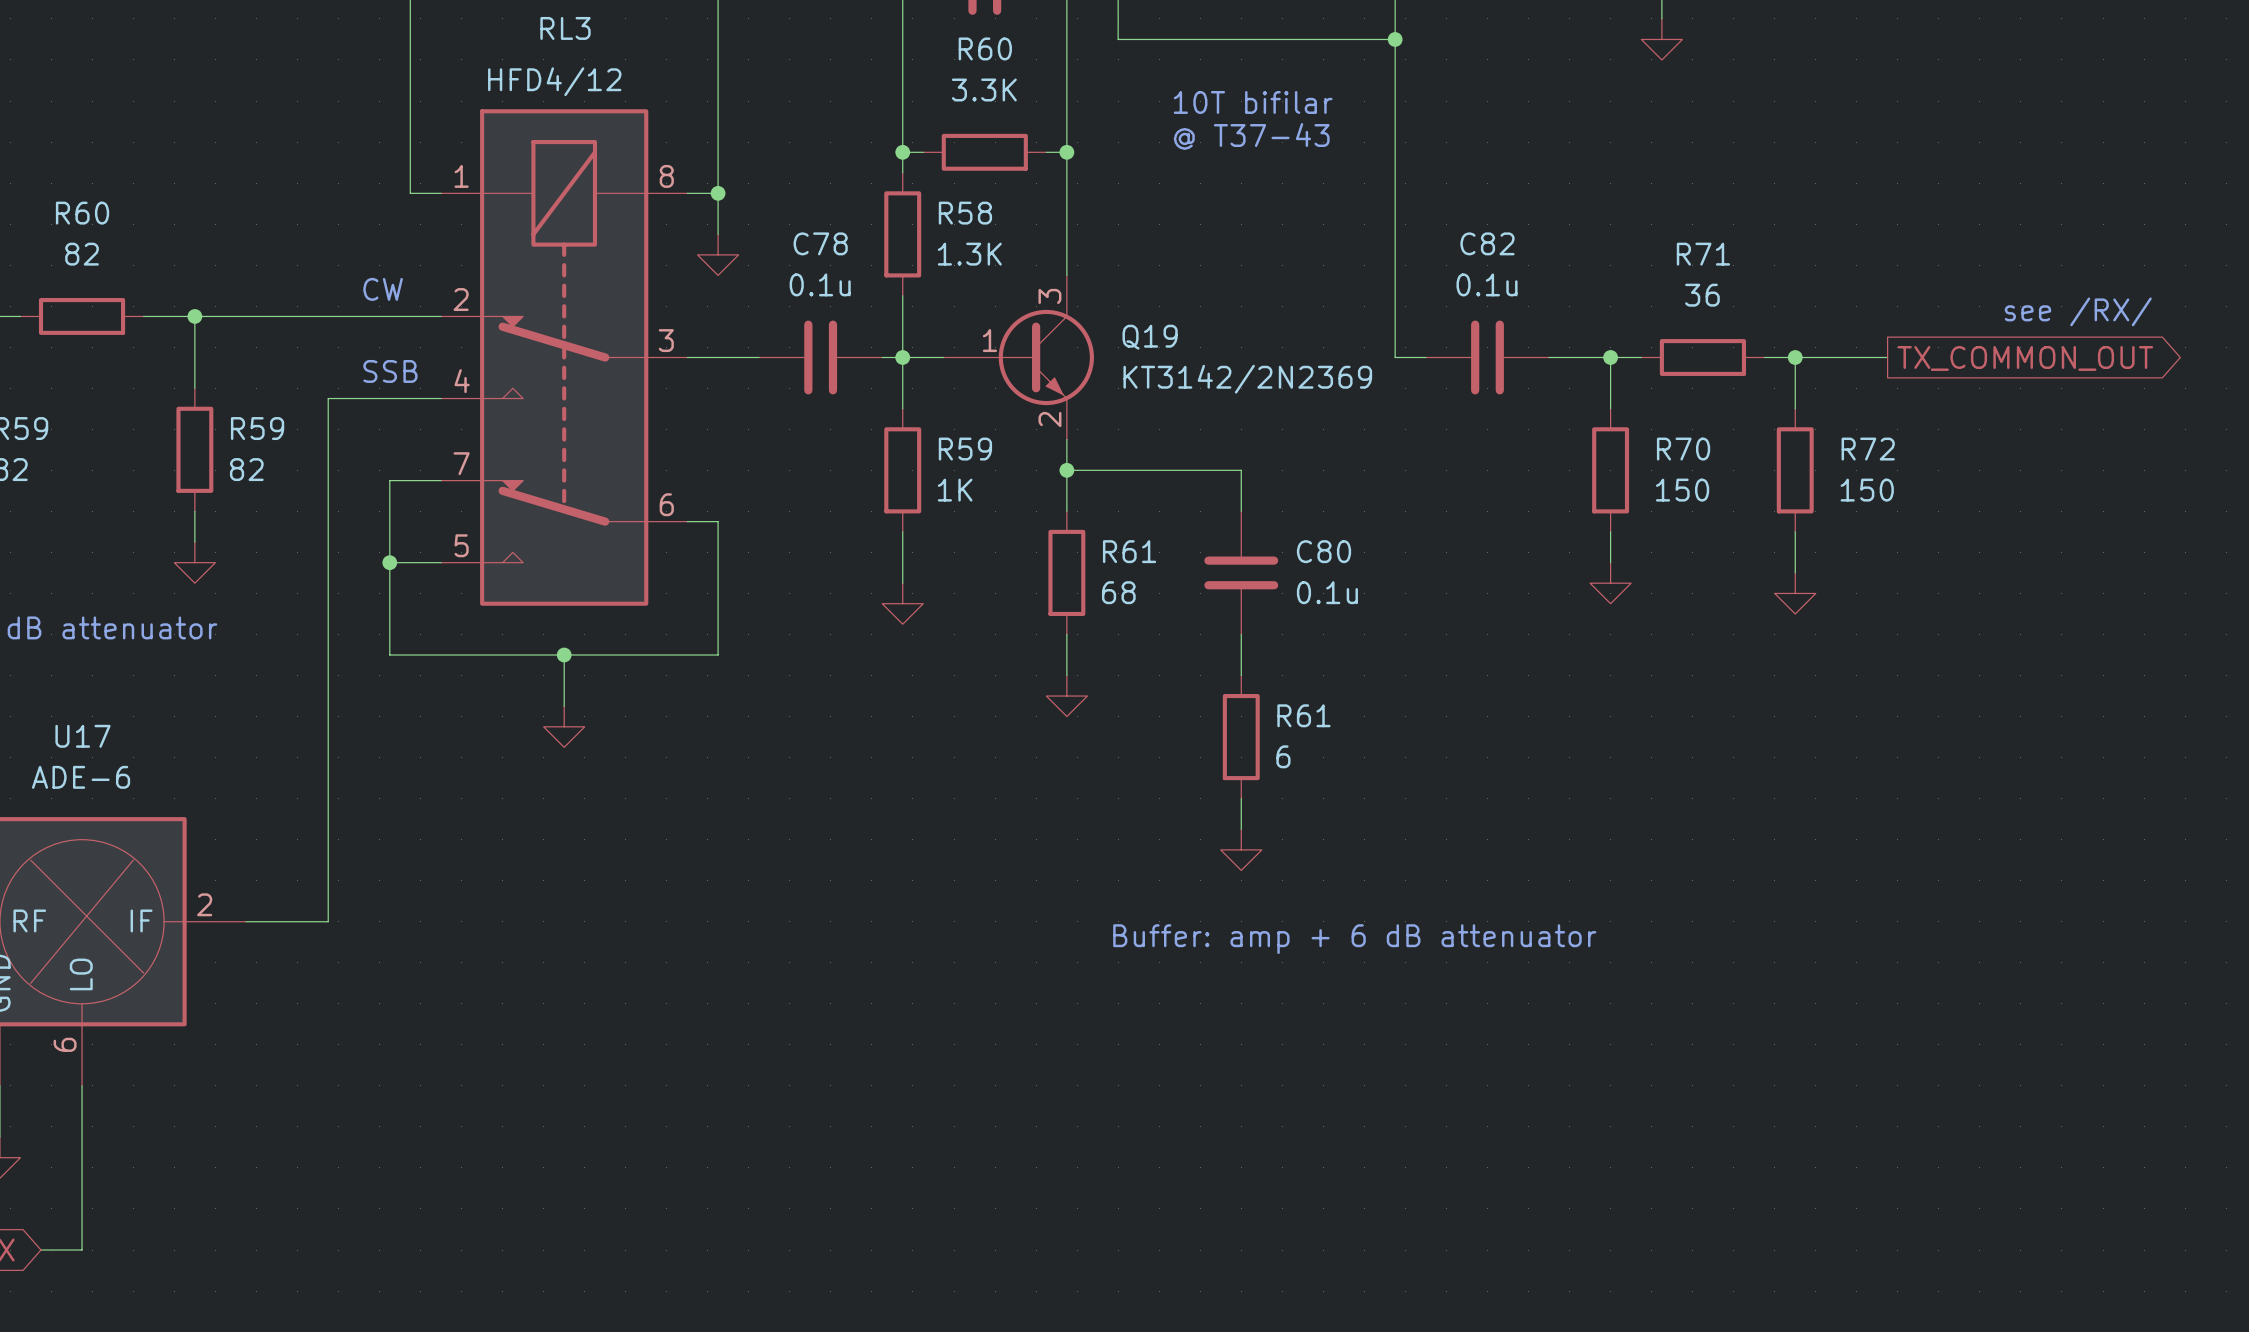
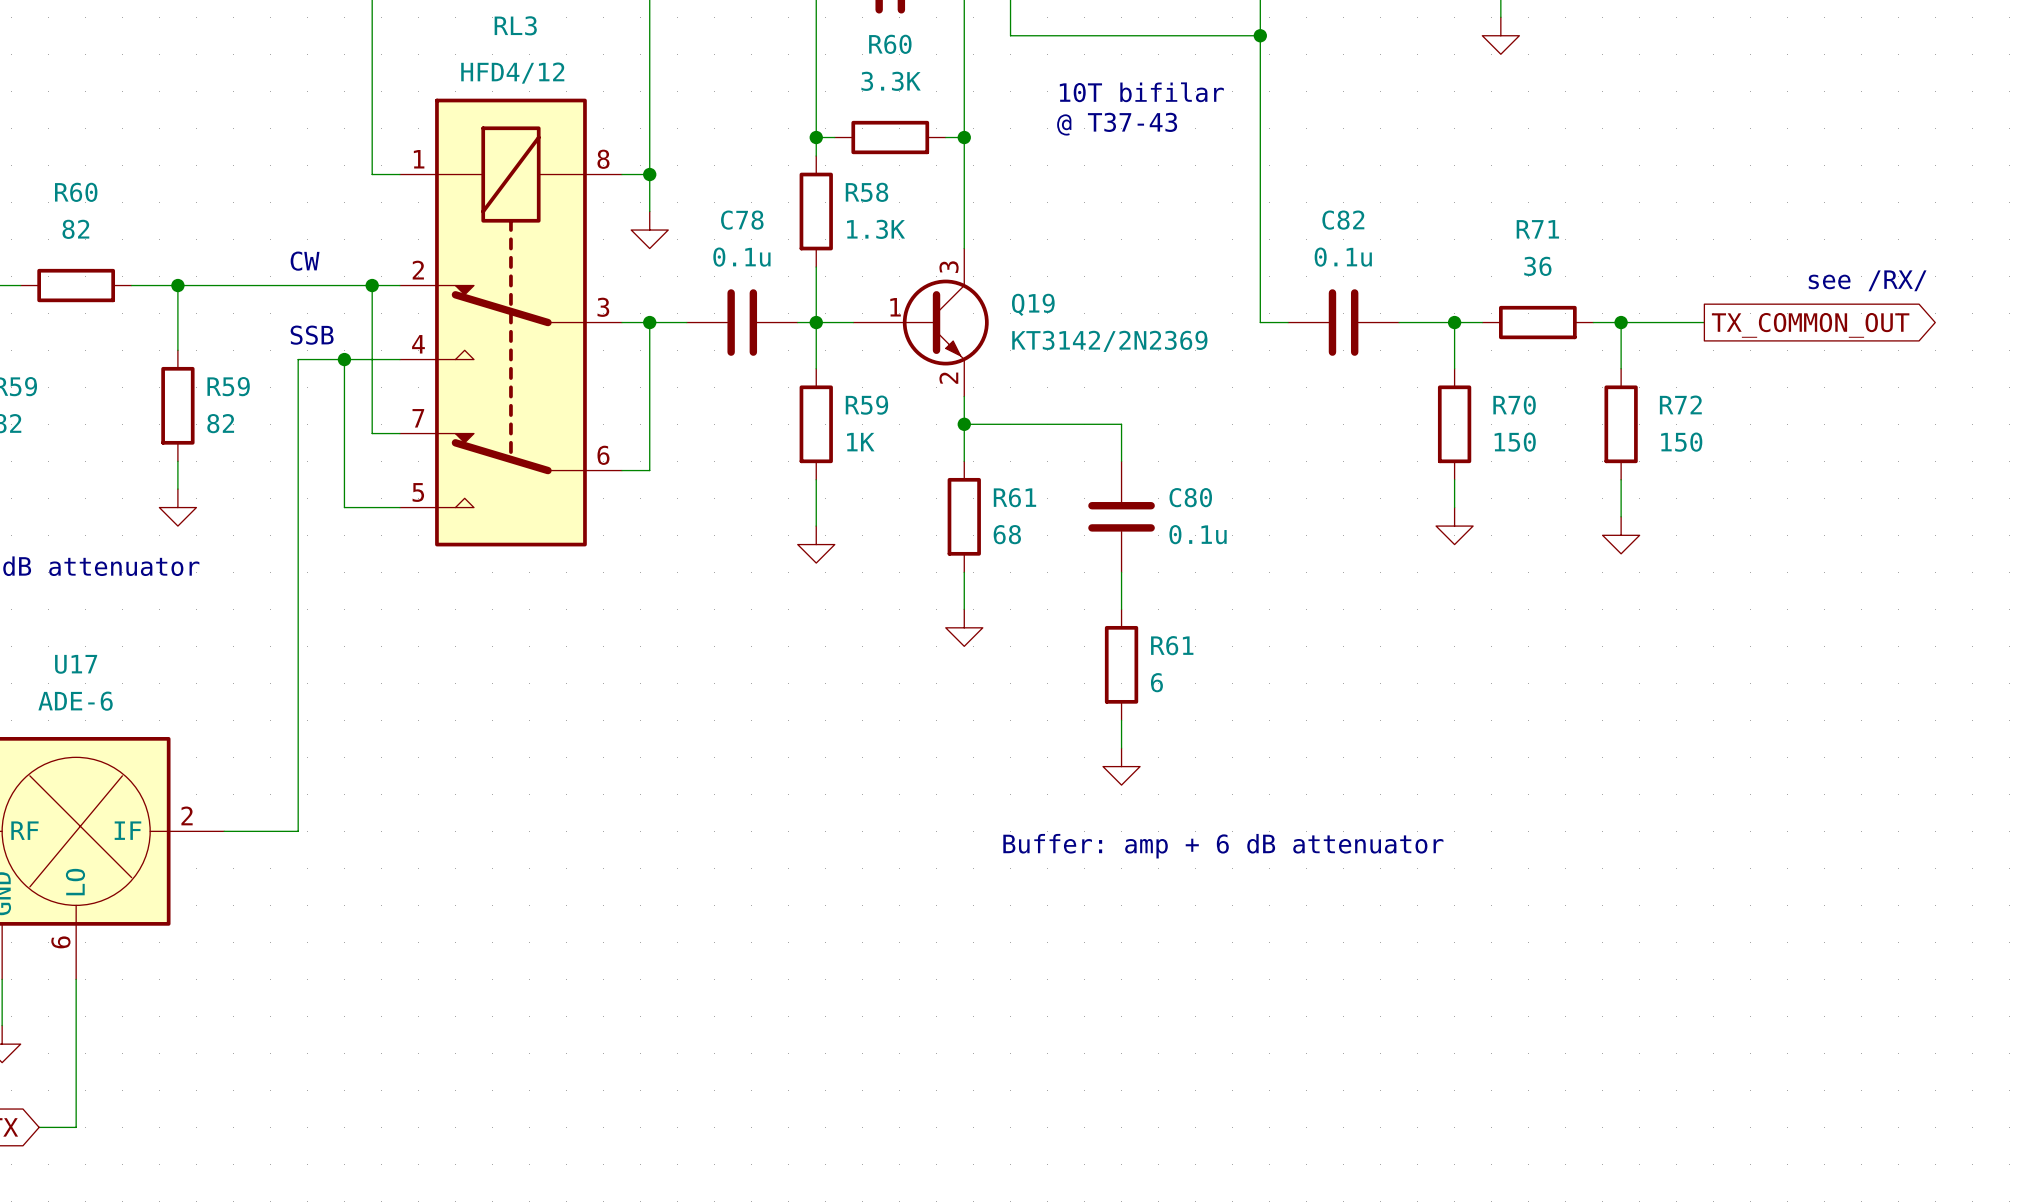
text position: CW (383, 289) -> CW (305, 261)
wire: none -> (372, 285) (372, 433)
junction: none -> (372, 285)
junction: none -> (649, 322)
text position: SSB (390, 371) -> SSB (312, 335)
wire: none -> (344, 359) (344, 507) (353, 507)
junction: none -> (344, 359)
wire: (410, 480) (389, 480) (389, 655) (718, 655) (718, 521) -> (649, 322) (649, 470)
junction: (389, 562) -> none
wire: (564, 655) (564, 706) -> none
junction: (564, 655) -> none
power symbol: (564, 726) -> none

